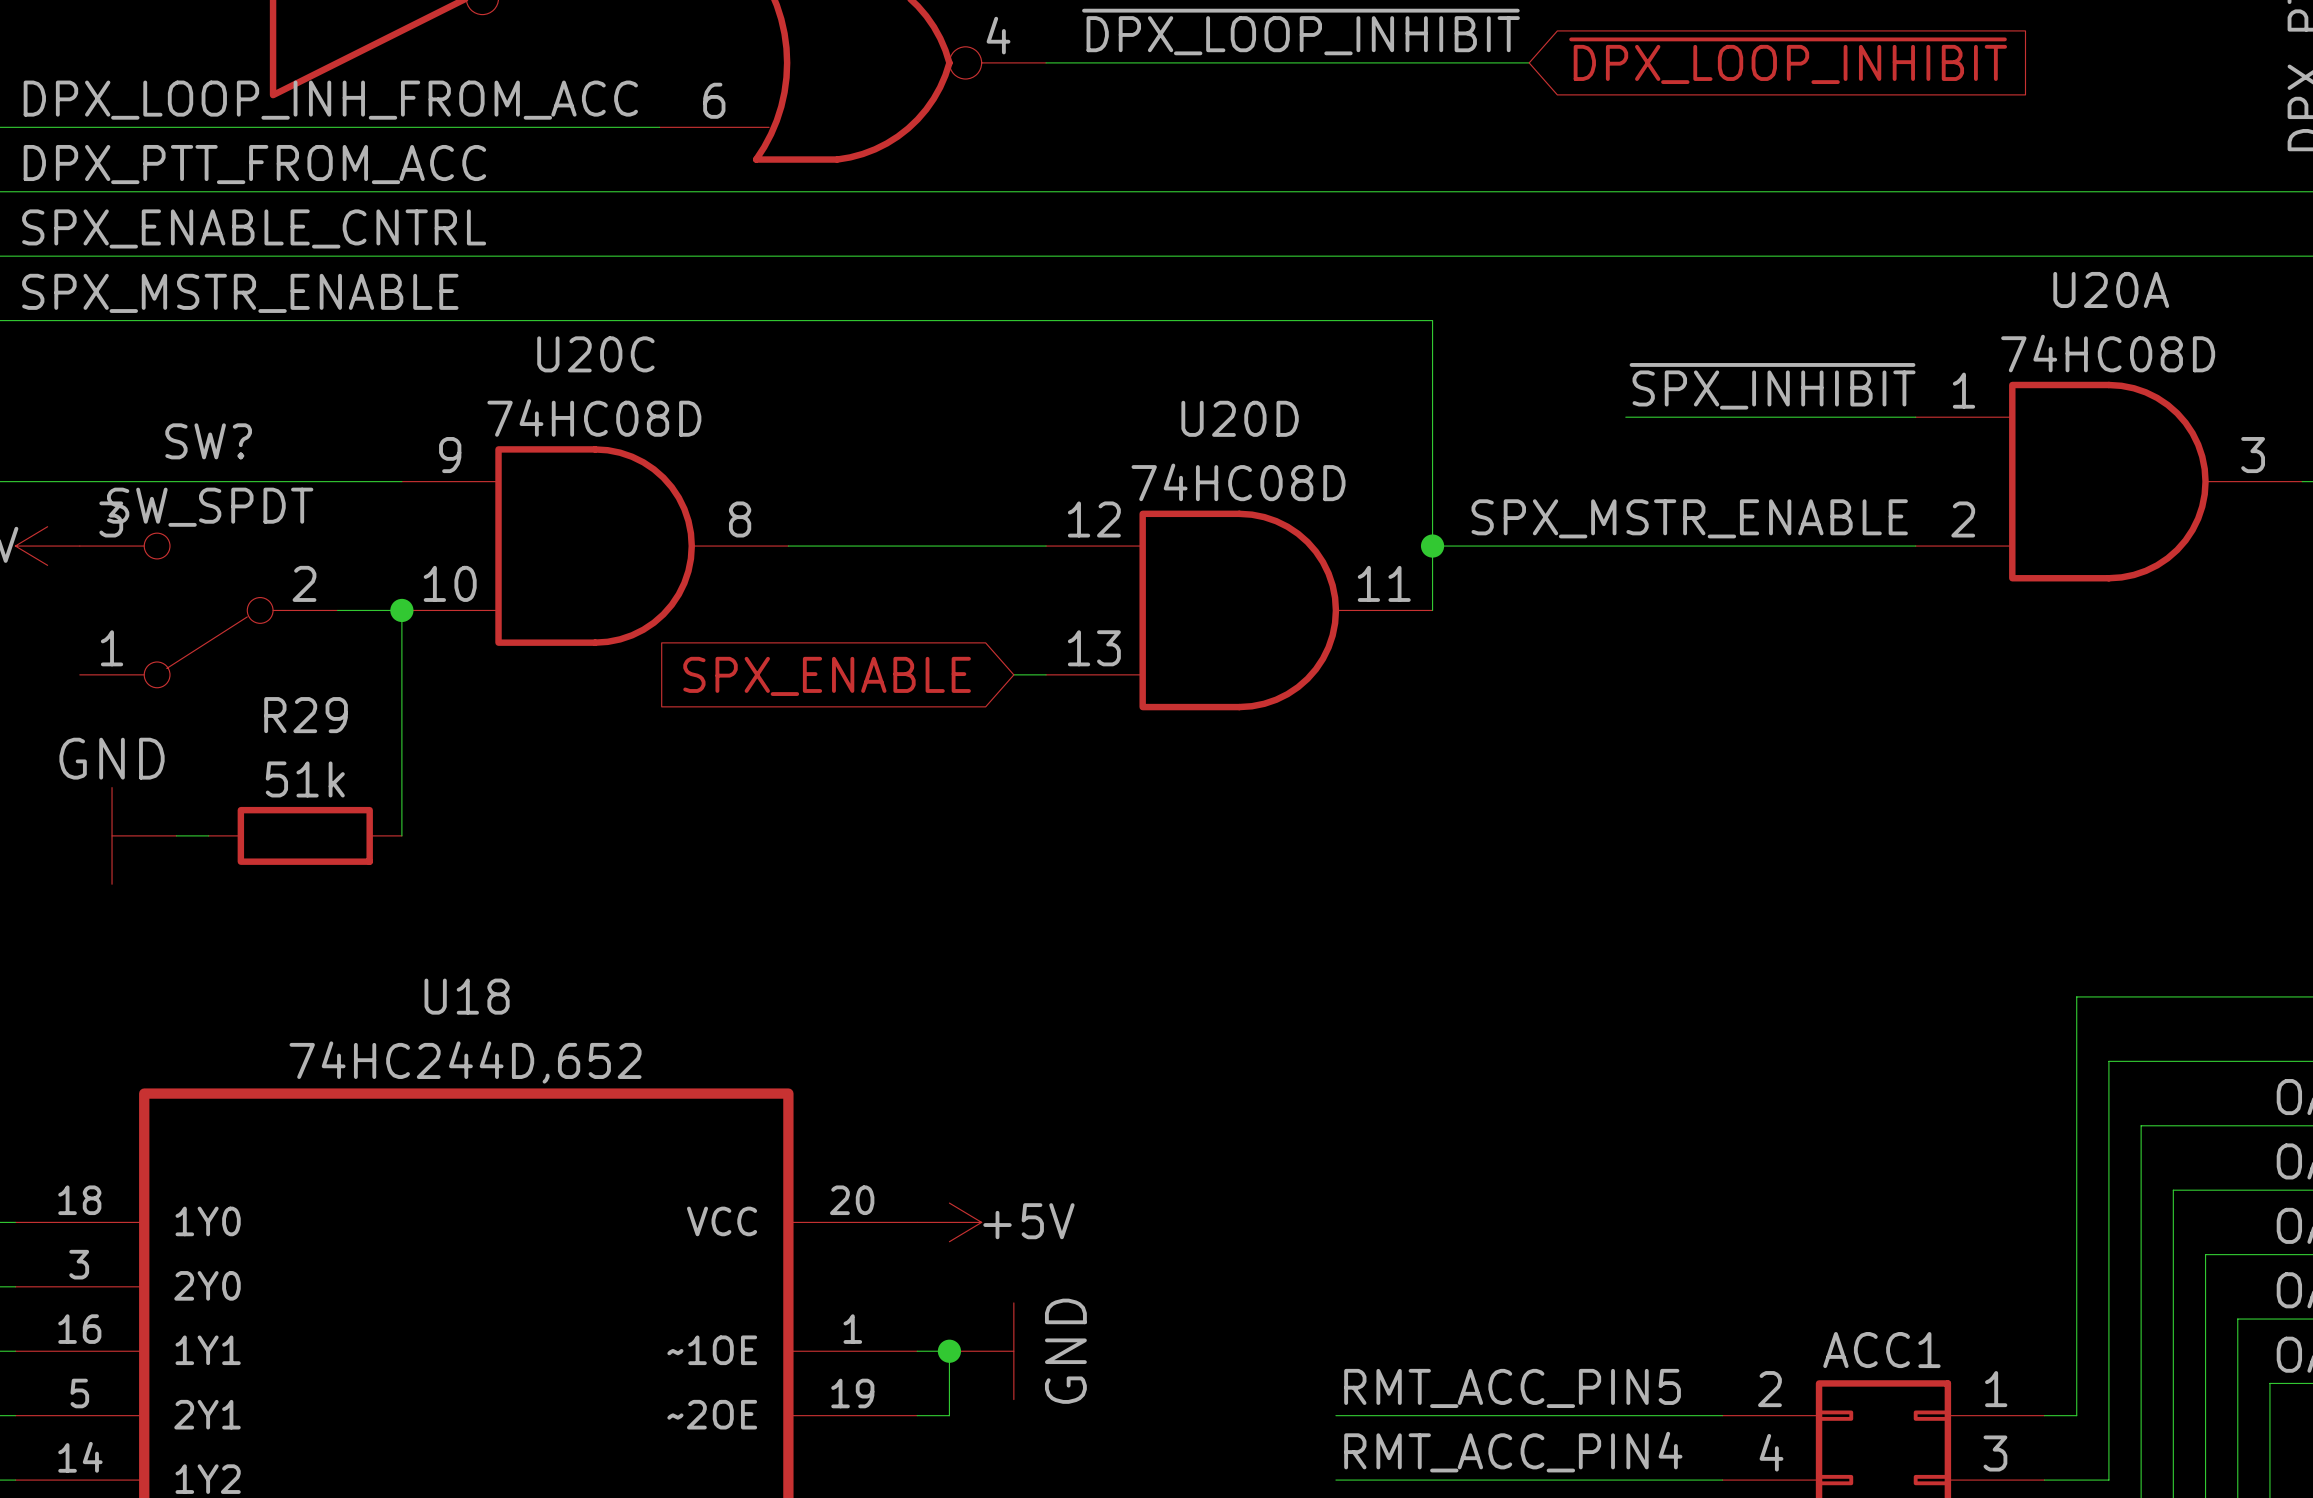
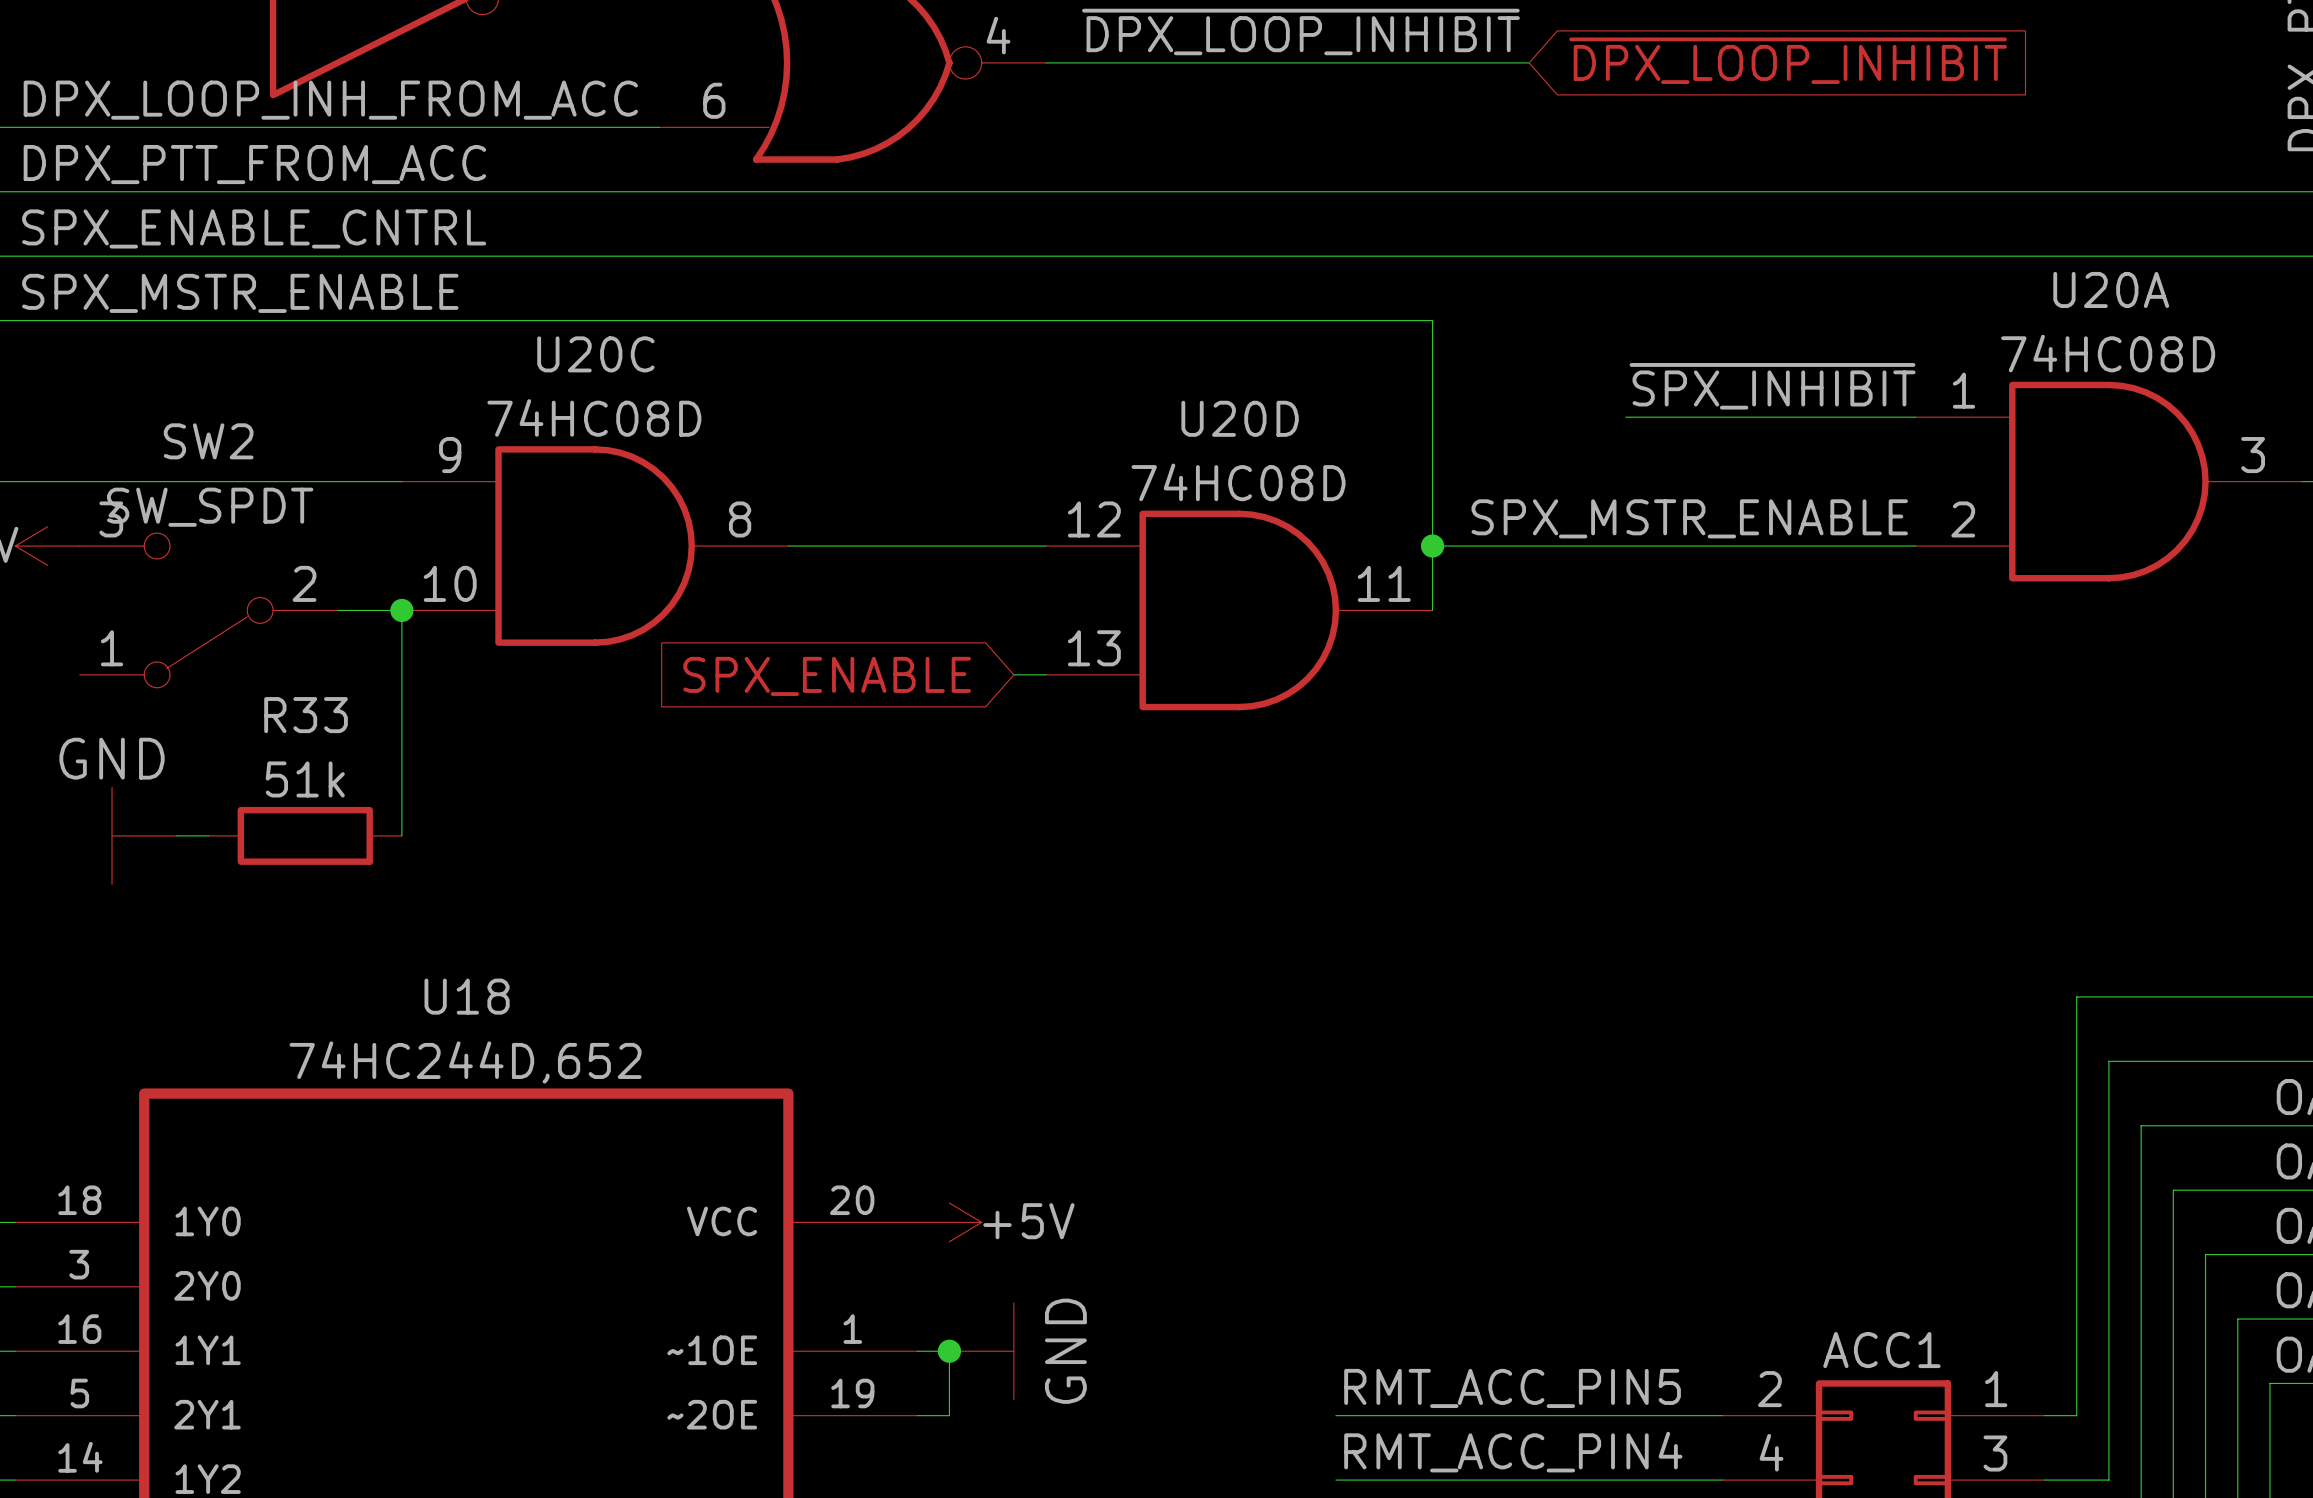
SW? name: SW? (208, 441) -> SW2 (208, 441)
R29 name: R29 (306, 715) -> R33 (306, 715)

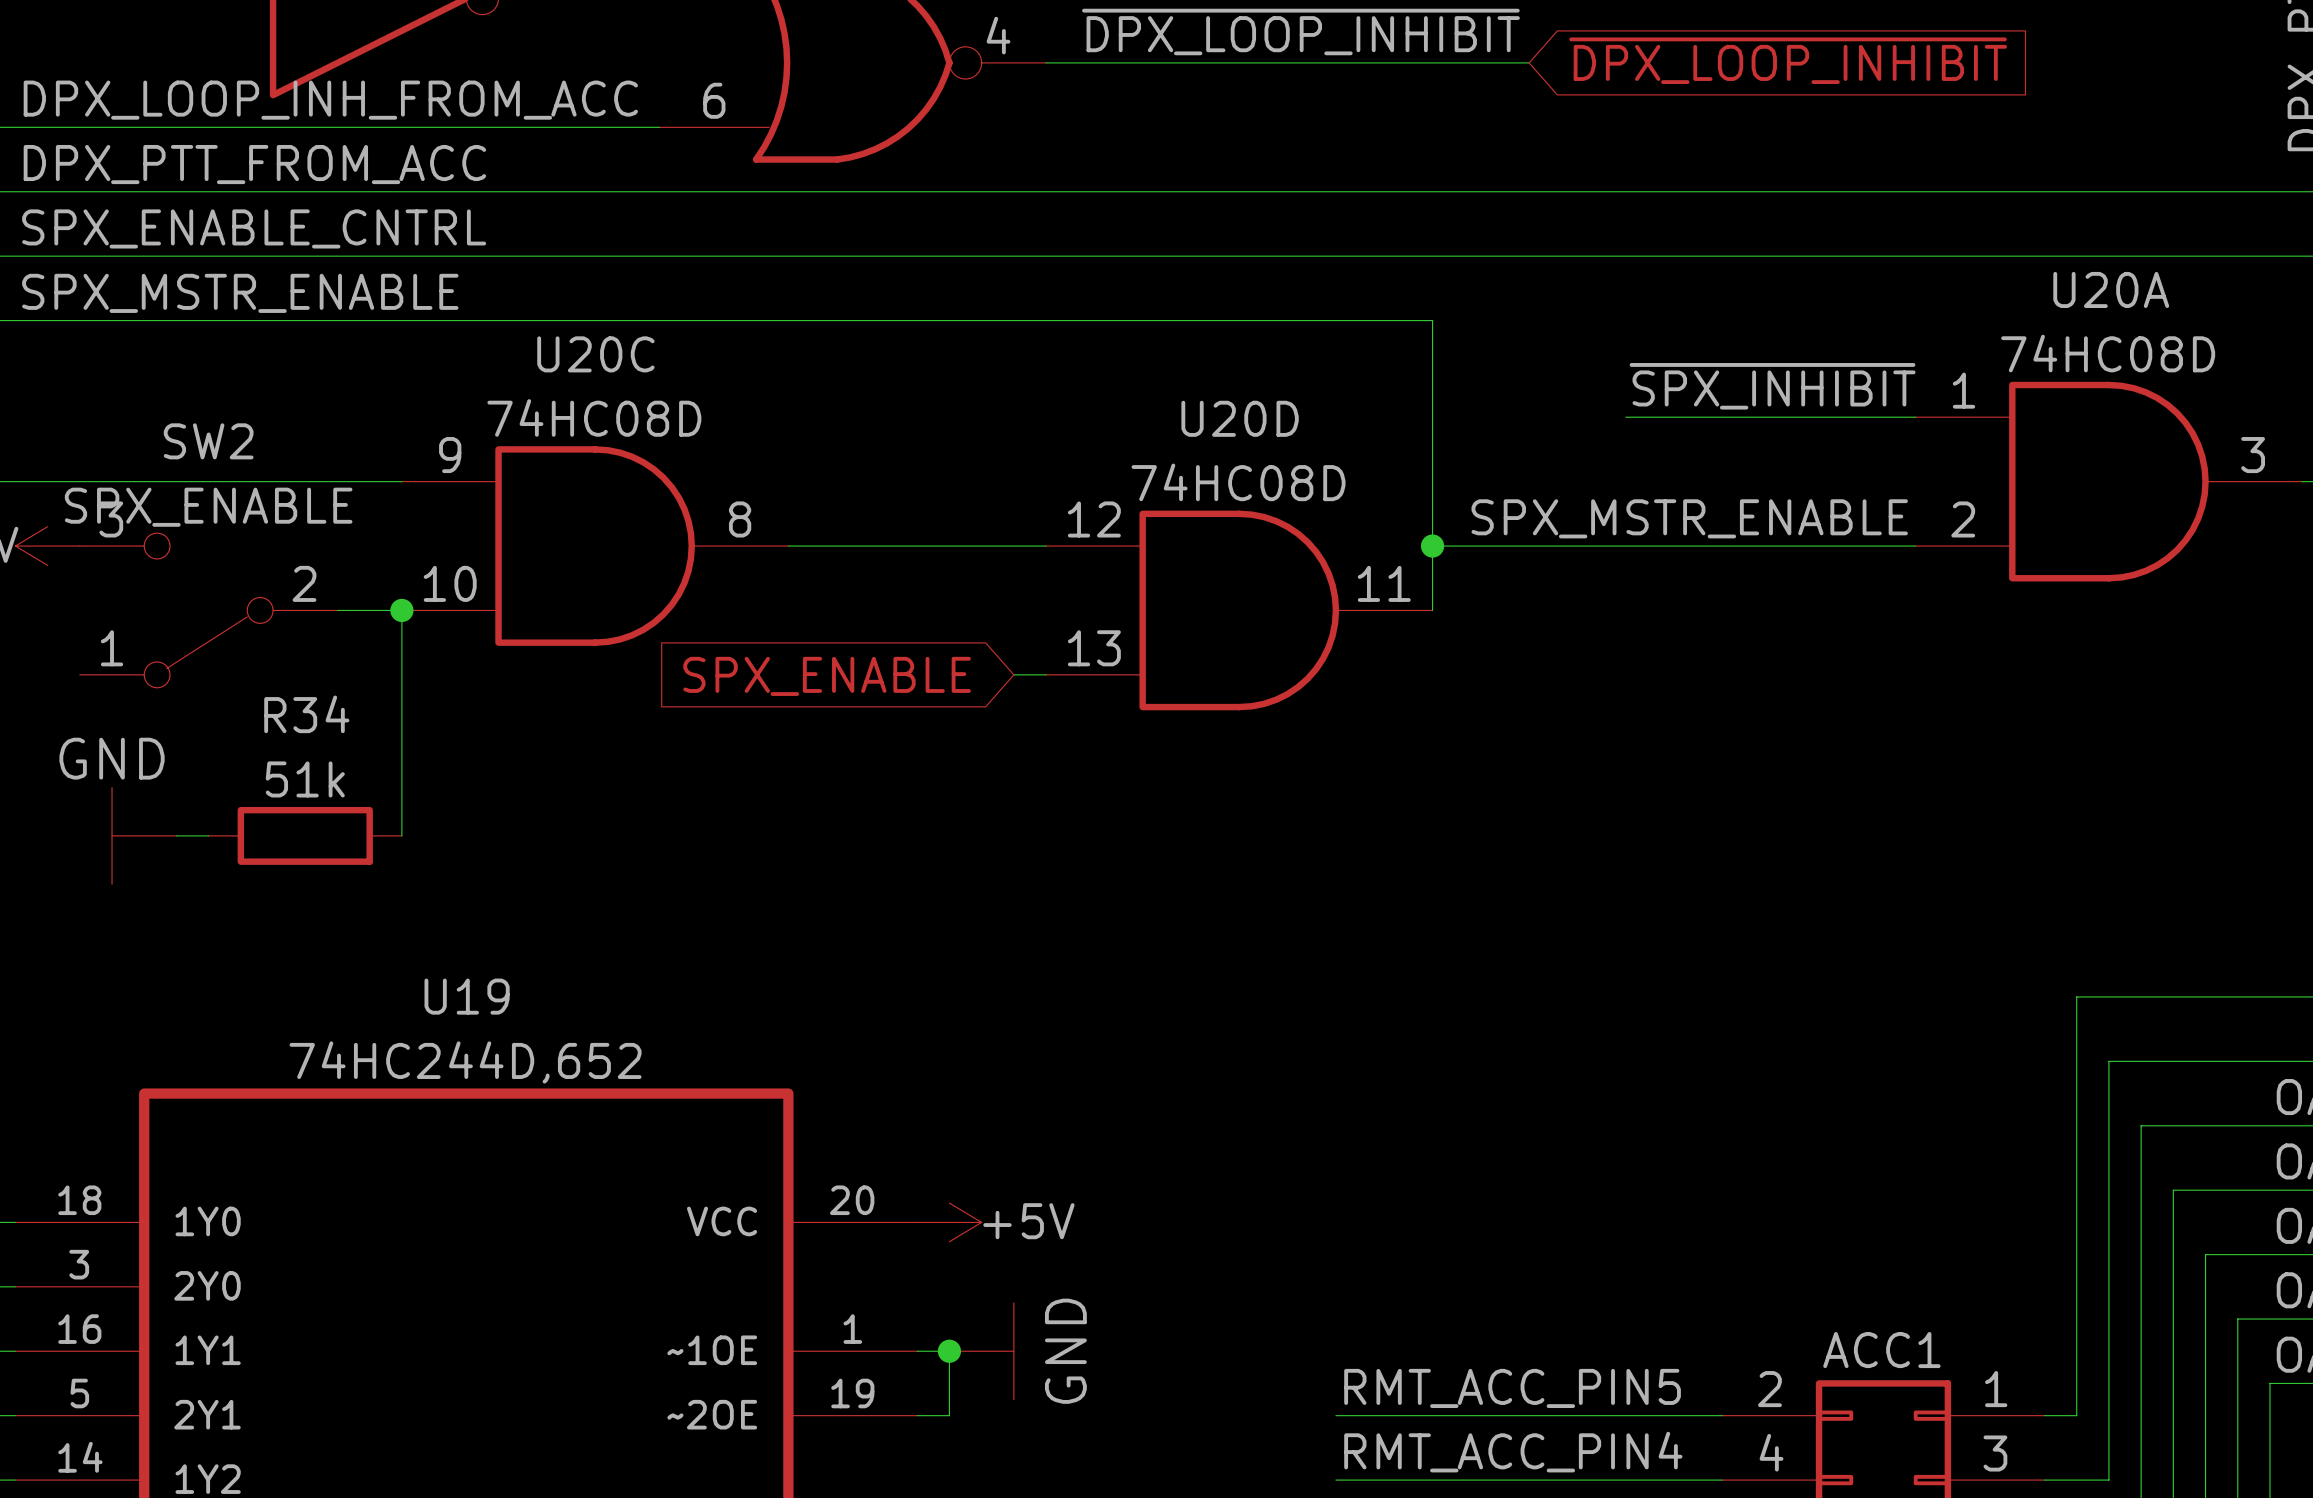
SW2 value: SW_SPDT (210, 507) -> SPX_ENABLE (208, 507)
R33 name: R33 (306, 715) -> R34 (306, 714)
U18 name: U18 (467, 996) -> U19 (467, 996)

